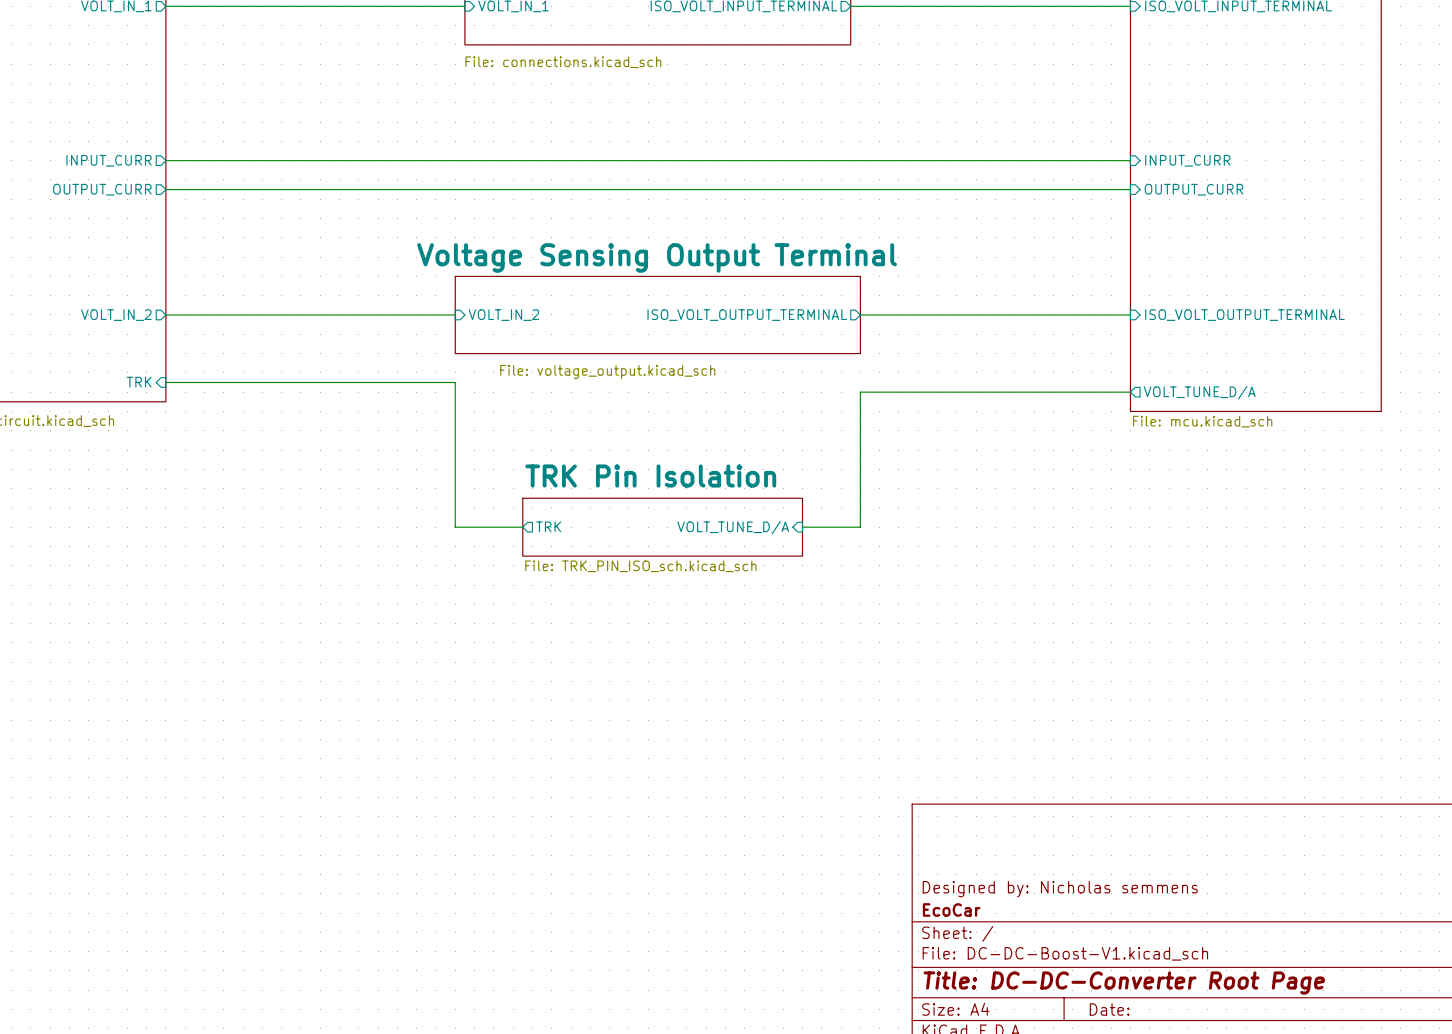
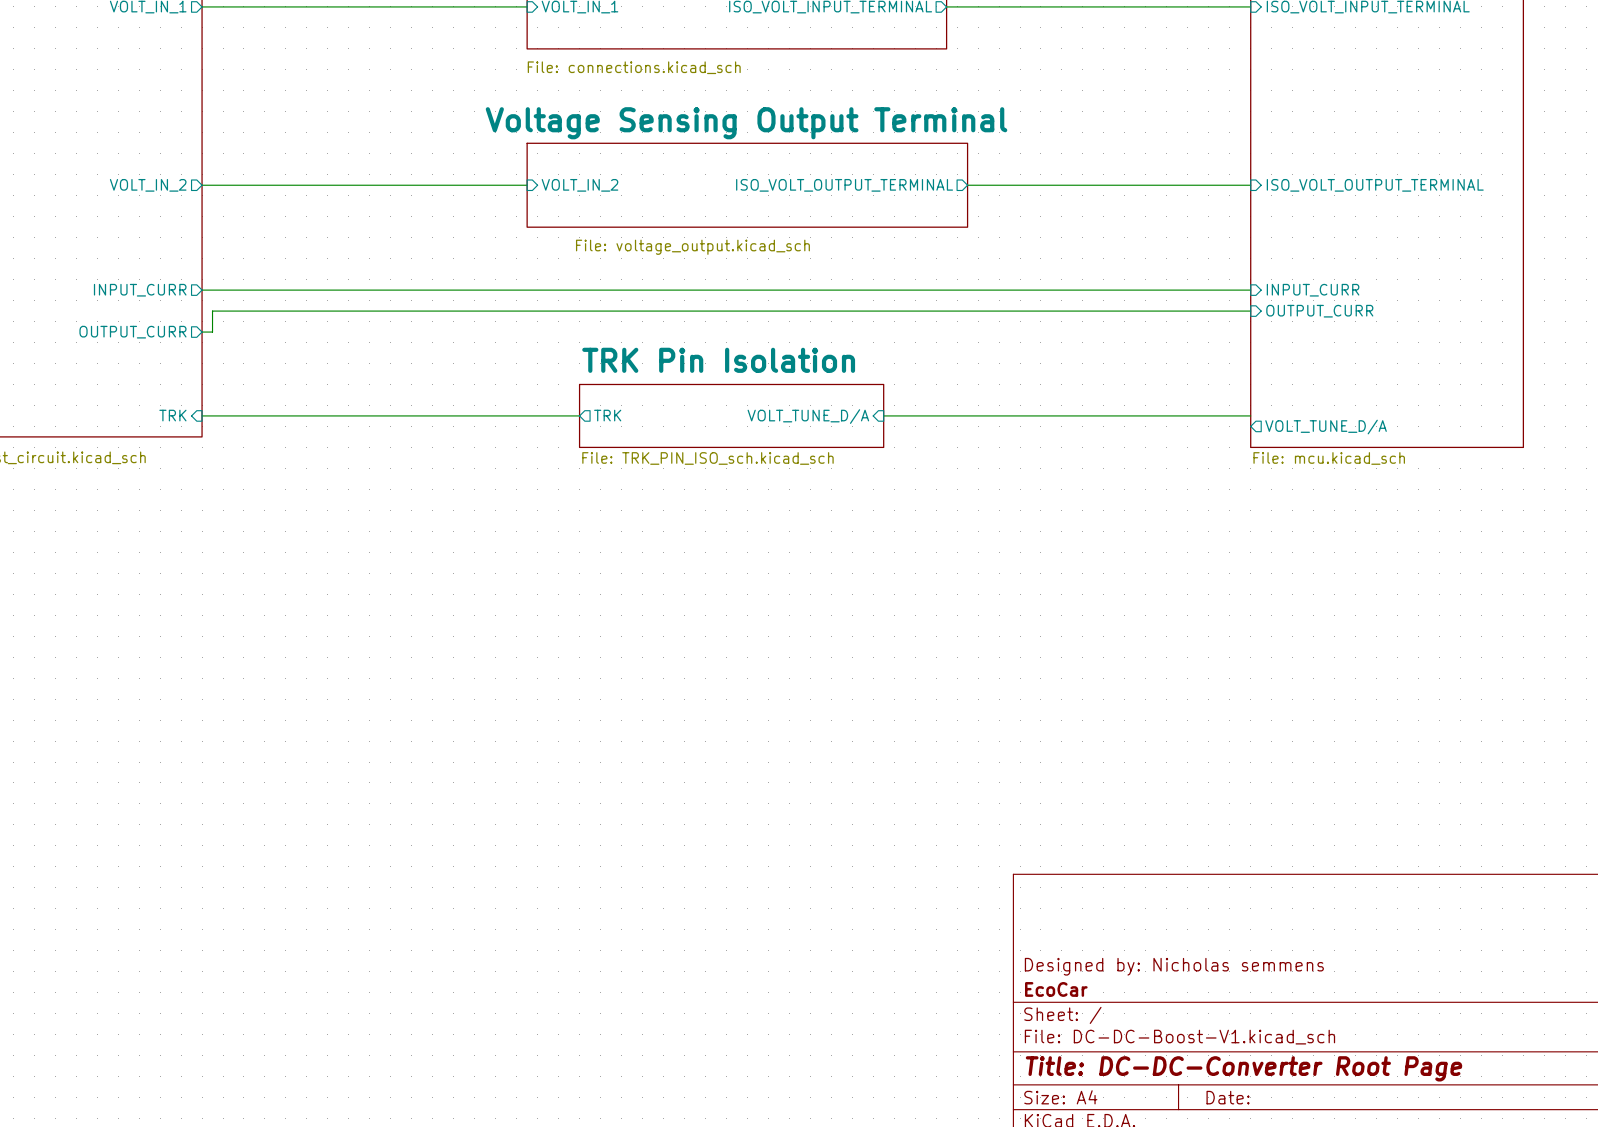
sheet pin position: INPUT_CURR (109, 160) -> INPUT_CURR (140, 290)
wire: (165, 160) (1130, 160) -> none
sheet pin position: INPUT_CURR (1187, 160) -> INPUT_CURR (1313, 290)
wire: none -> (202, 185) (527, 185)
wire: none -> (967, 185) (1250, 185)
sheet pin position: OUTPUT_CURR (102, 189) -> OUTPUT_CURR (132, 332)
wire: (165, 189) (1130, 189) -> (202, 290) (1250, 290)
sheet pin position: OUTPUT_CURR (1193, 189) -> OUTPUT_CURR (1319, 311)
wire: none -> (1250, 311) (212, 311) (212, 332) (202, 332)
wire: (165, 314) (455, 314) -> none
sheet Voltage Sensing Output Terminal position: (657, 314) -> (747, 185)
wire: (860, 314) (1130, 314) -> none
sheet pin position: VOLT_IN_2 (116, 315) -> VOLT_IN_2 (148, 185)
sheet pin position: VOLT_IN_2 (503, 315) -> VOLT_IN_2 (579, 185)
sheet pin position: ISO_VOLT_OUTPUT_TERMINAL (747, 315) -> ISO_VOLT_OUTPUT_TERMINAL (844, 185)
sheet pin position: ISO_VOLT_OUTPUT_TERMINAL (1244, 315) -> ISO_VOLT_OUTPUT_TERMINAL (1375, 185)
wire: (455, 382) (455, 527) (522, 527) -> (516, 415) (579, 415)
wire: none -> (883, 415) (1250, 415)
wire: (1130, 392) (860, 392) (860, 527) (802, 527) -> none
sheet pin position: TRK (548, 526) -> TRK (607, 415)
sheet TRK Pin Isolation position: (662, 527) -> (731, 415)
sheet pin position: VOLT_TUNE_D/A (733, 527) -> VOLT_TUNE_D/A (808, 416)

